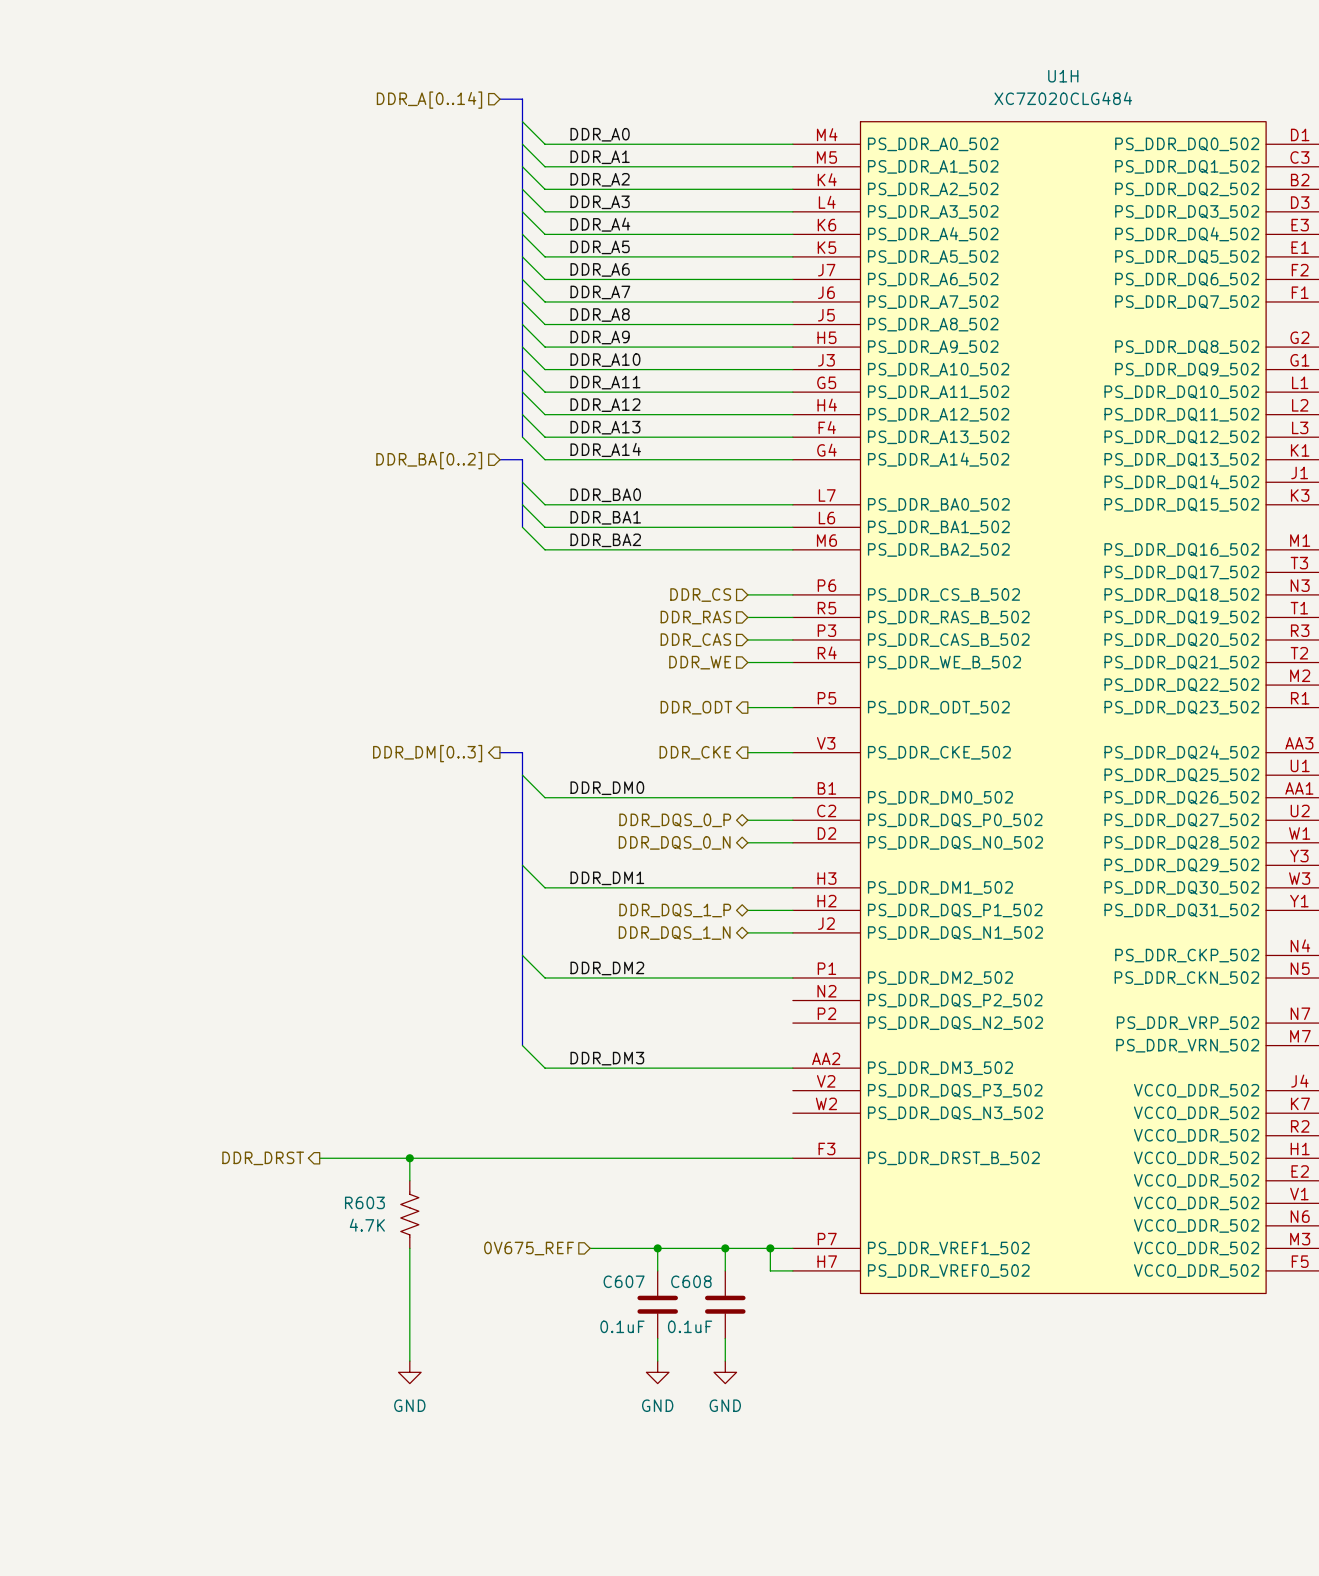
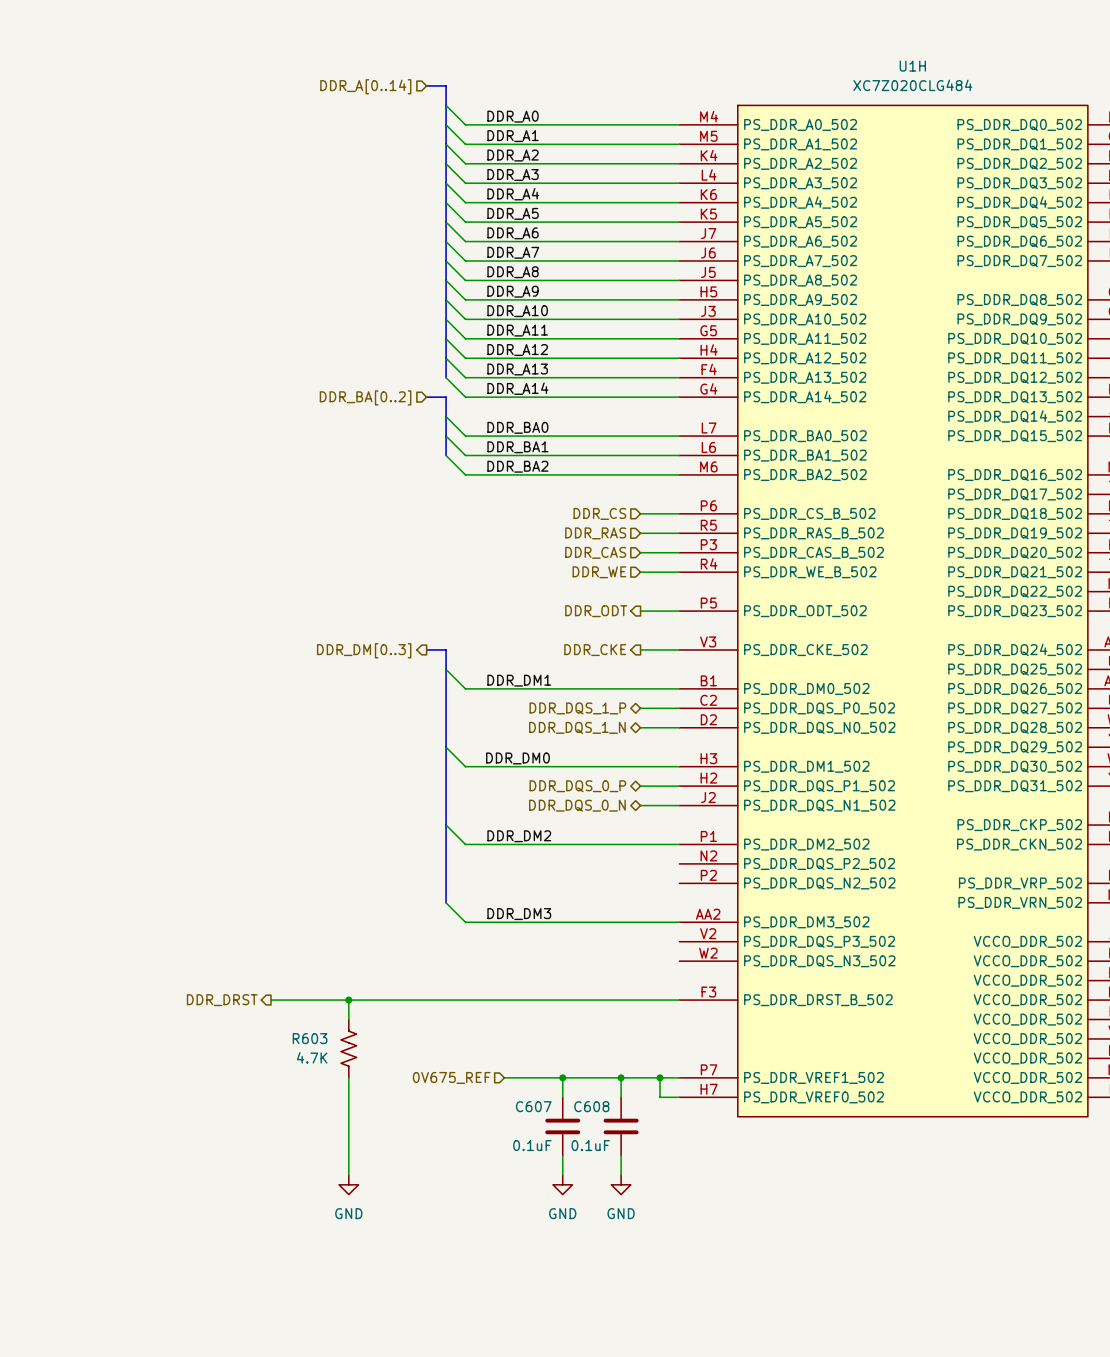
label: DDR_DM0 (607, 788) -> DDR_DM1 (519, 680)
hierarchical label: DDR_DQS_0_P (675, 820) -> DDR_DQS_1_P (577, 708)
hierarchical label: DDR_DQS_0_N (674, 842) -> DDR_DQS_1_N (577, 727)
label: DDR_DM1 (607, 878) -> DDR_DM0 (517, 758)
hierarchical label: DDR_DQS_1_P (675, 910) -> DDR_DQS_0_P (577, 786)
hierarchical label: DDR_DQS_1_N (674, 933) -> DDR_DQS_0_N (577, 805)

